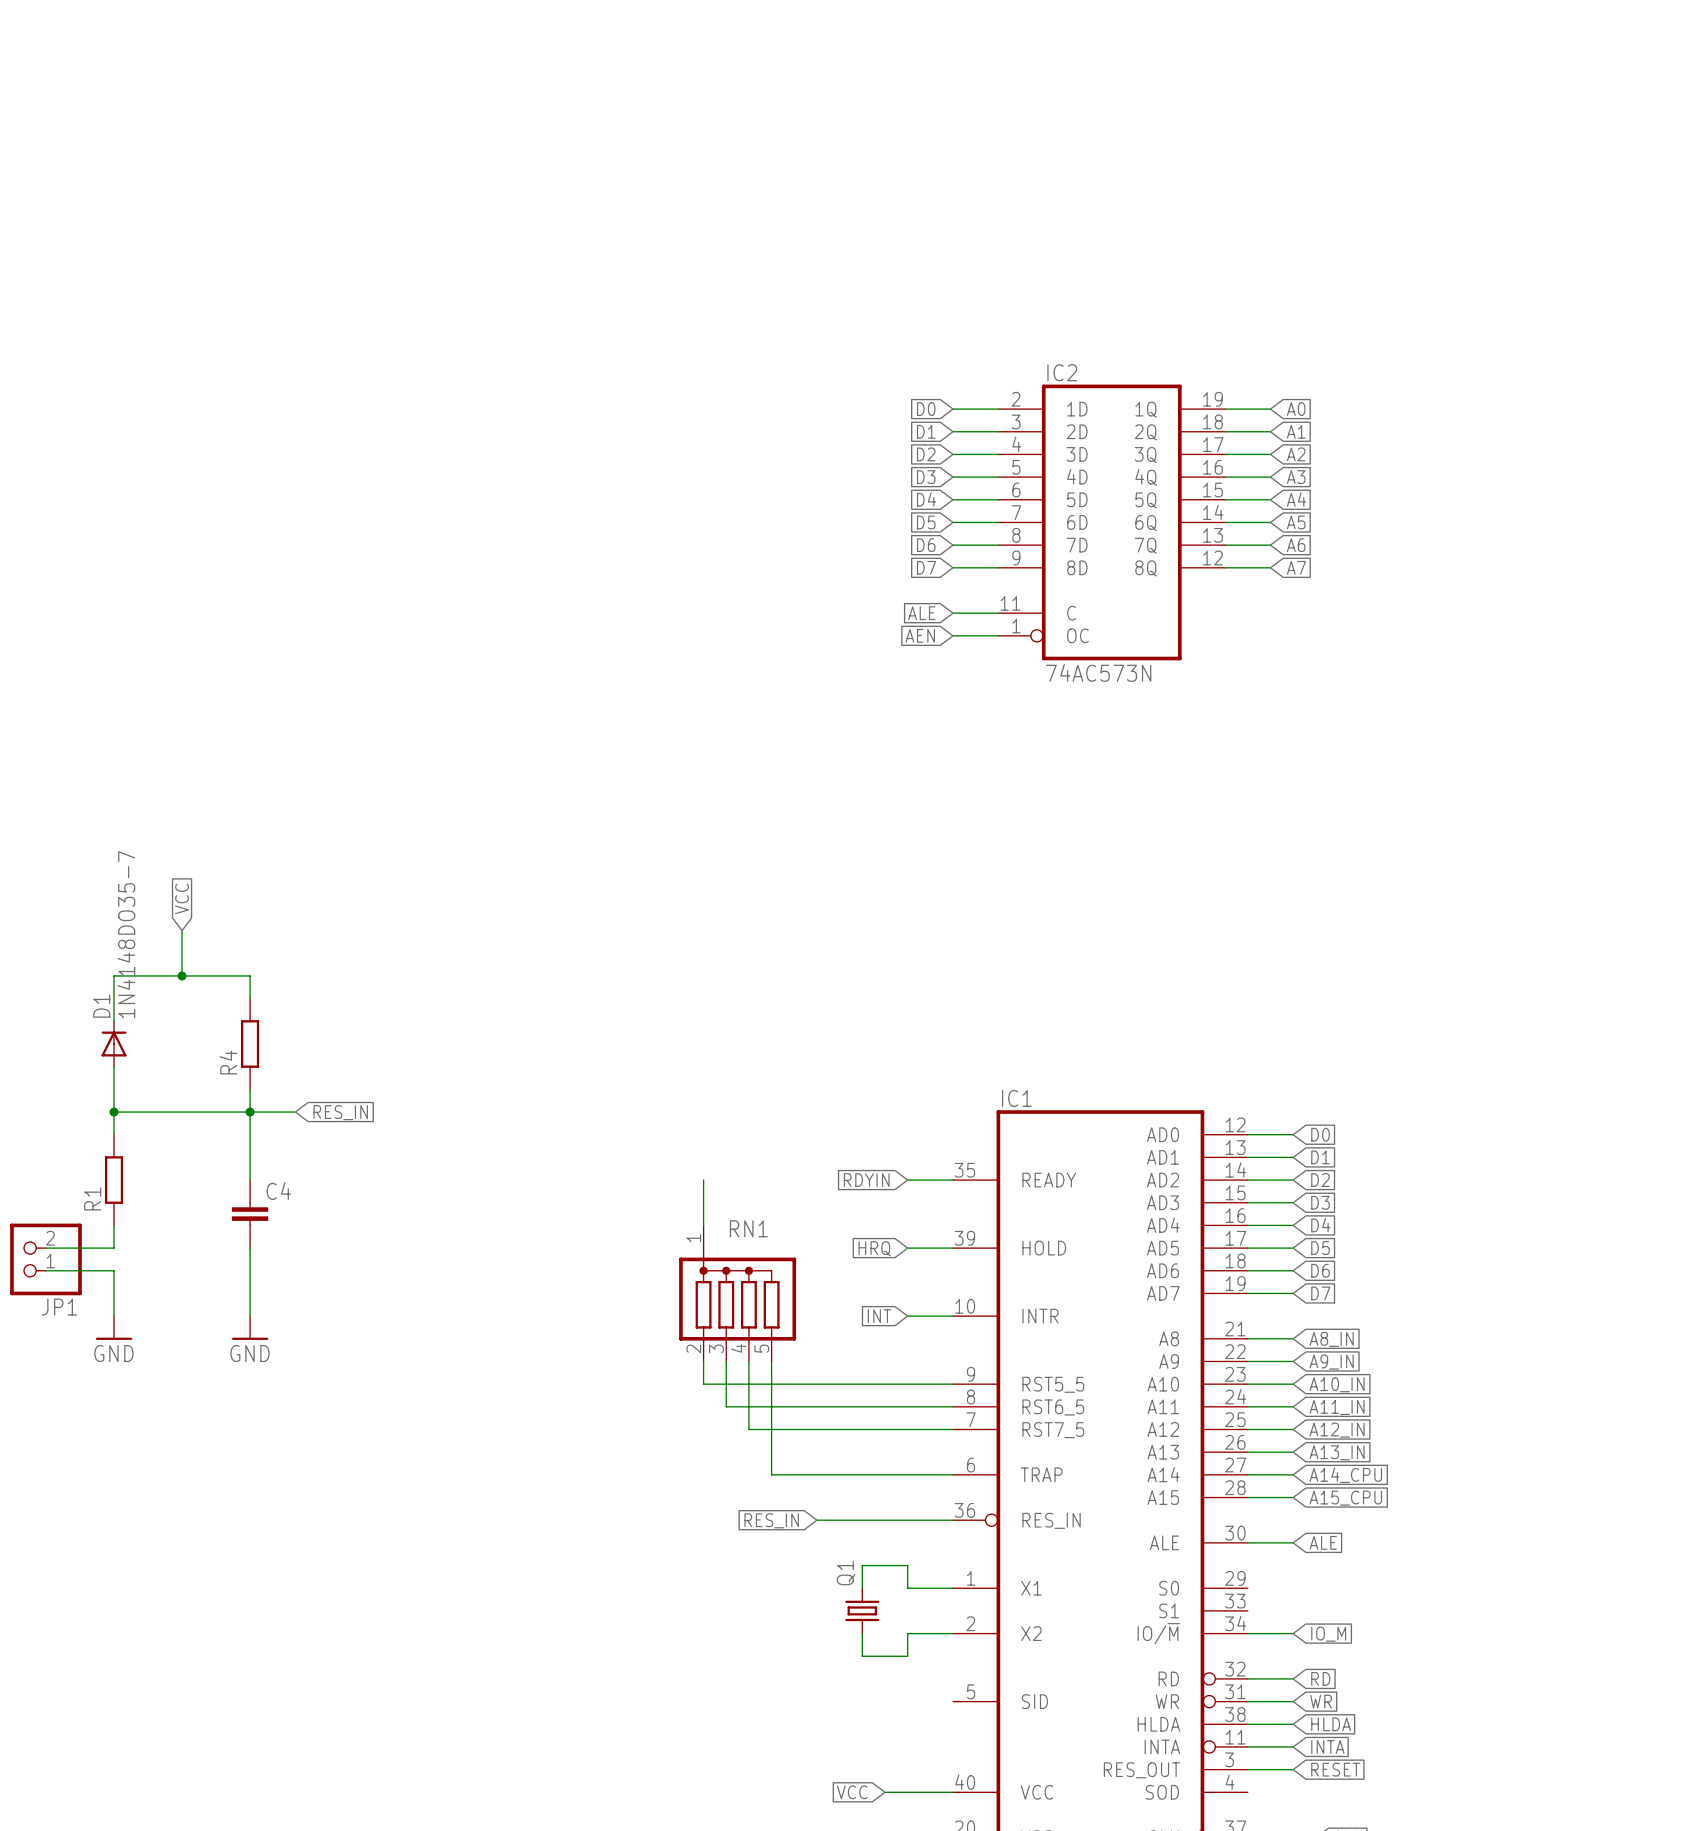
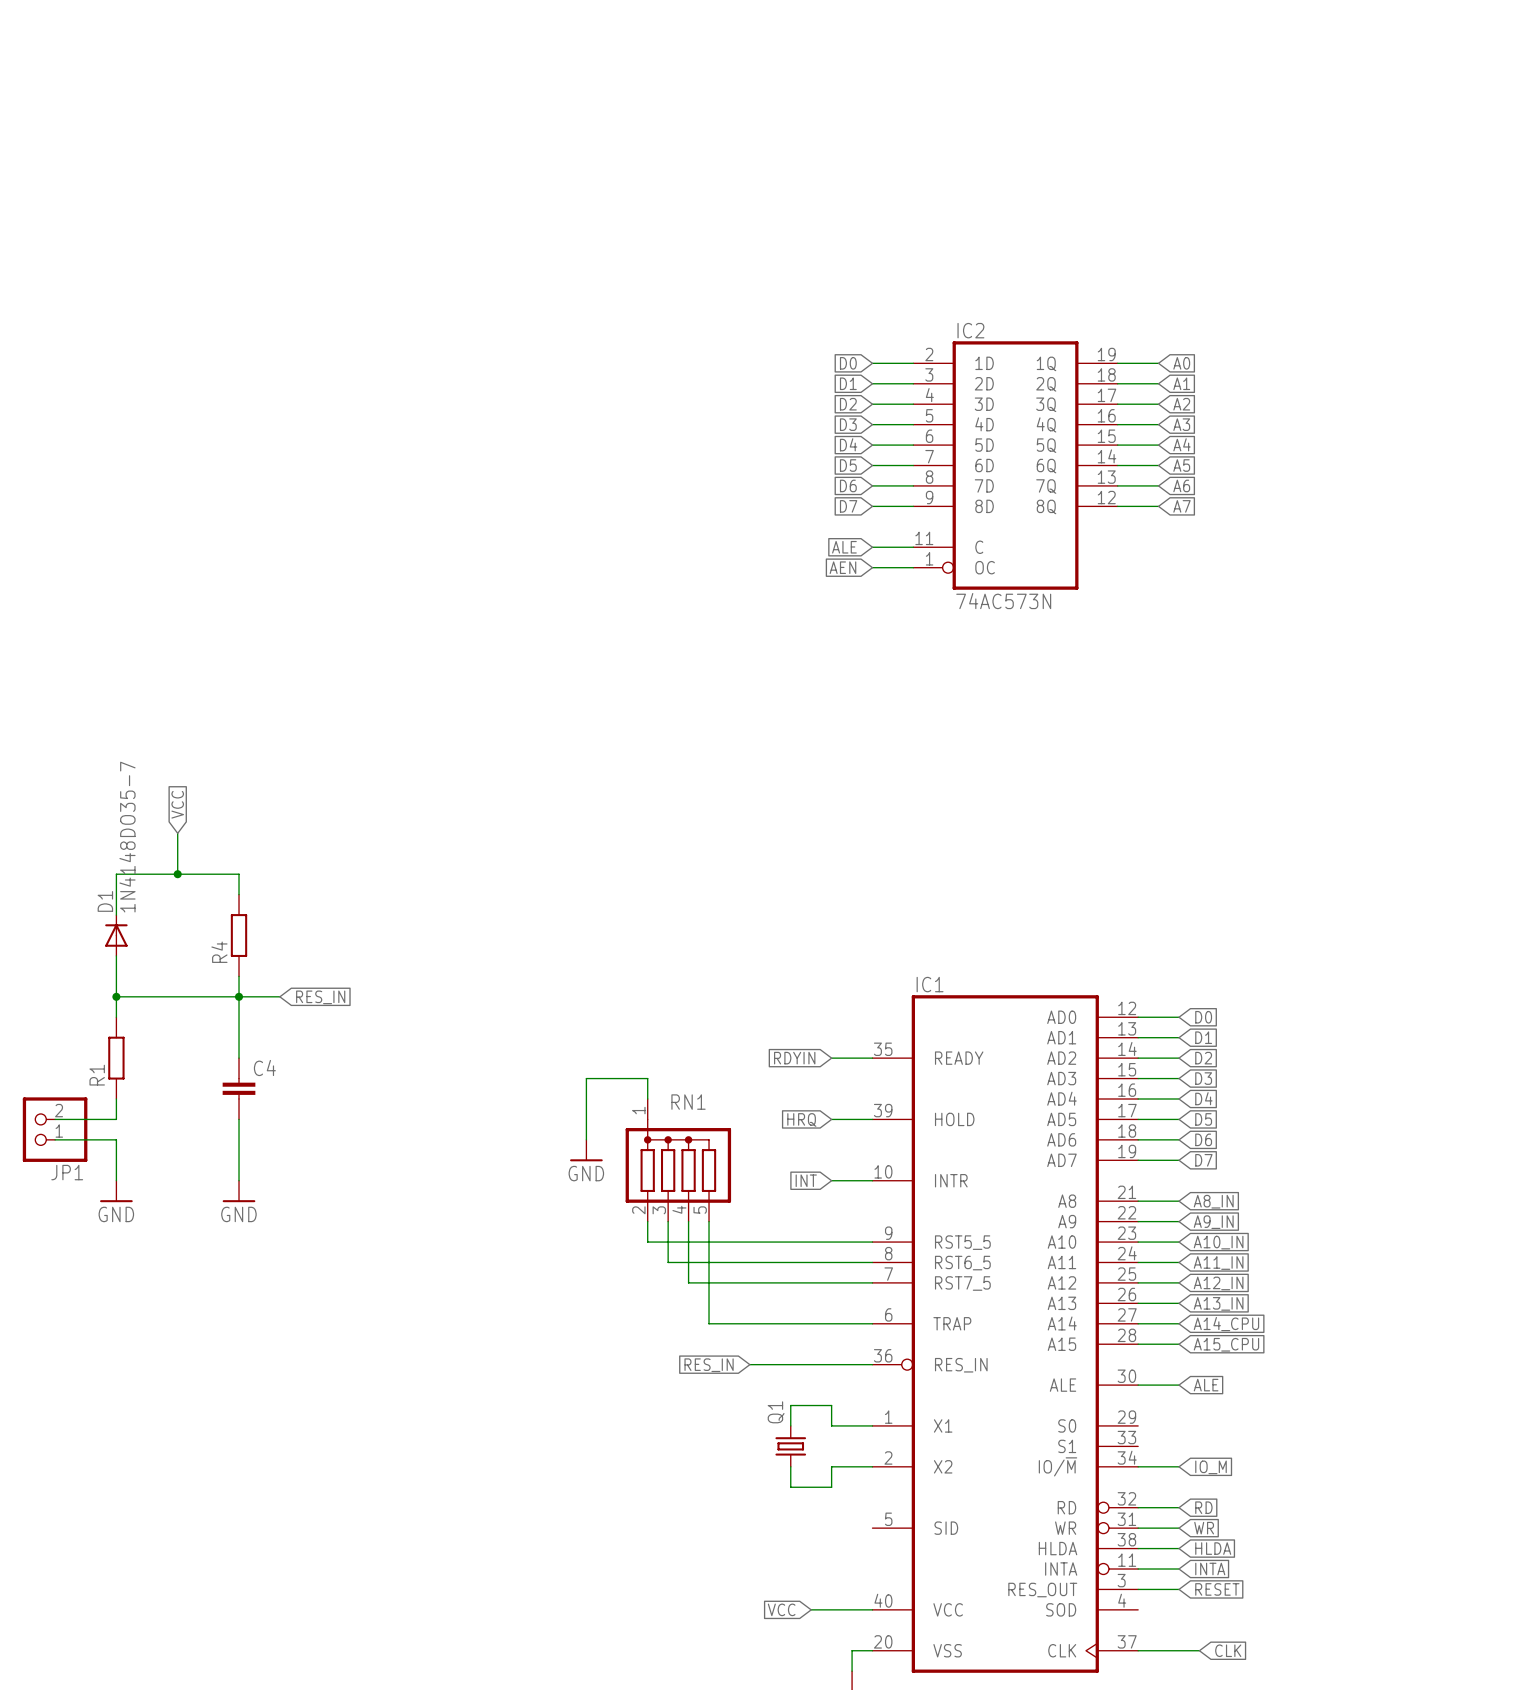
wire: (703, 1180) (703, 1202) -> (586, 1139) (586, 1078) (647, 1078)
power symbol: none -> GND (586, 1150)

